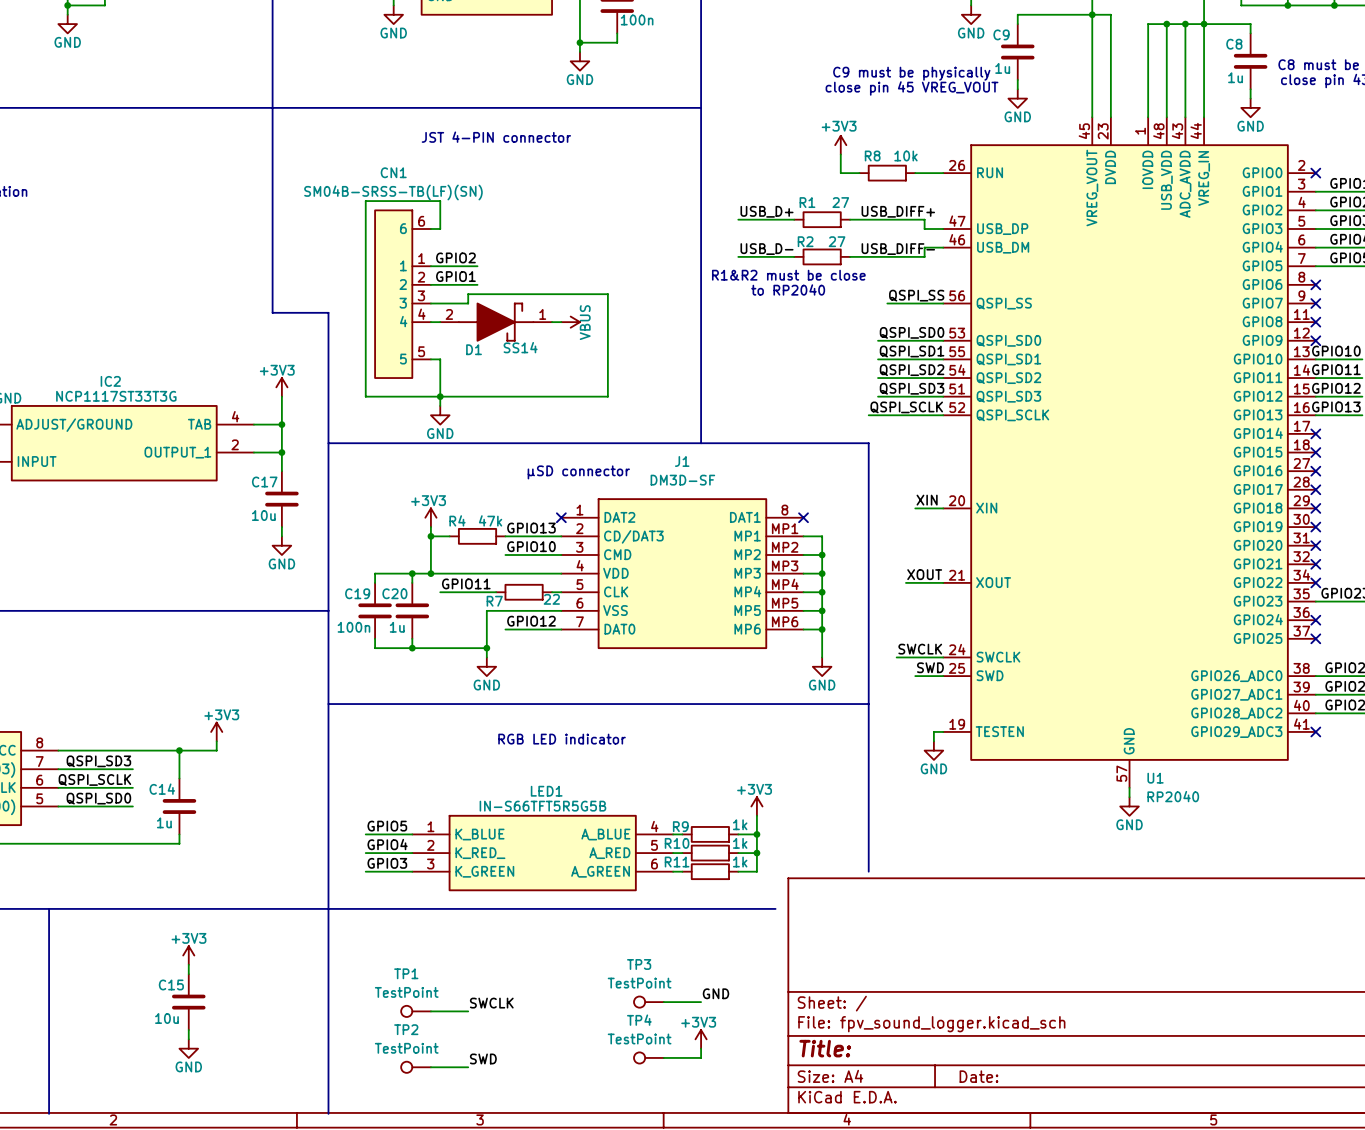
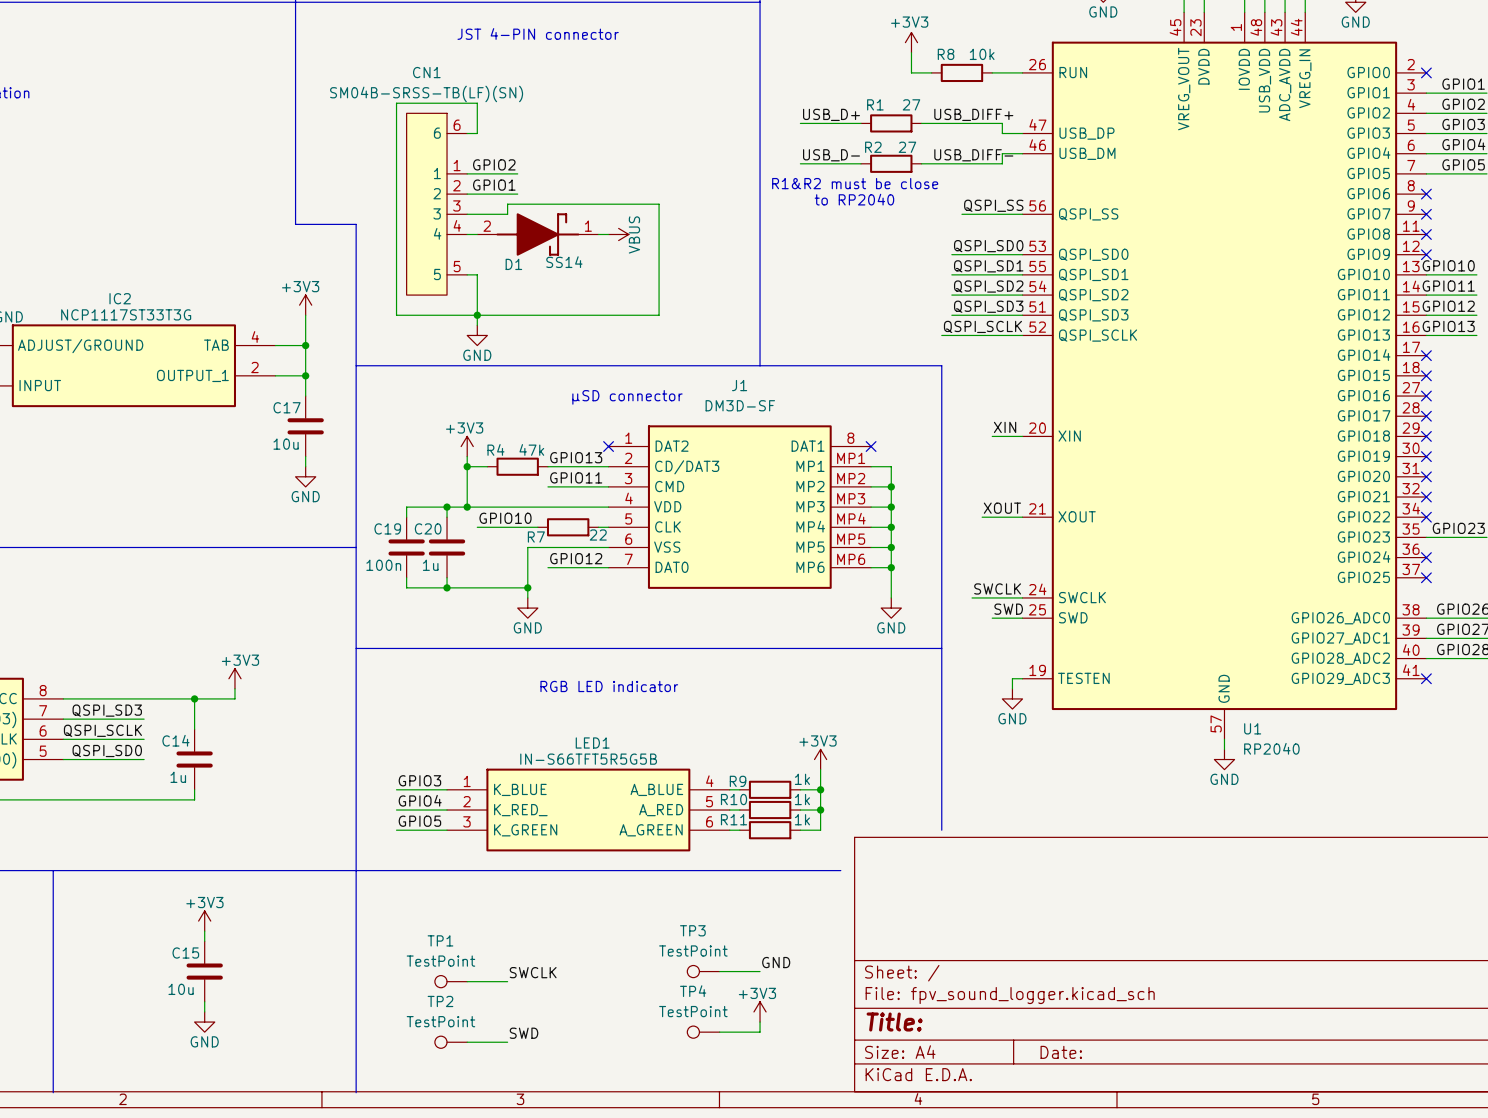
label: GPIO10 (531, 546) -> GPIO11 (576, 477)
label: GPIO11 (466, 583) -> GPIO10 (505, 518)
label: GPIO5 (387, 826) -> GPIO3 (419, 780)
label: GPIO3 (387, 863) -> GPIO5 (419, 821)

